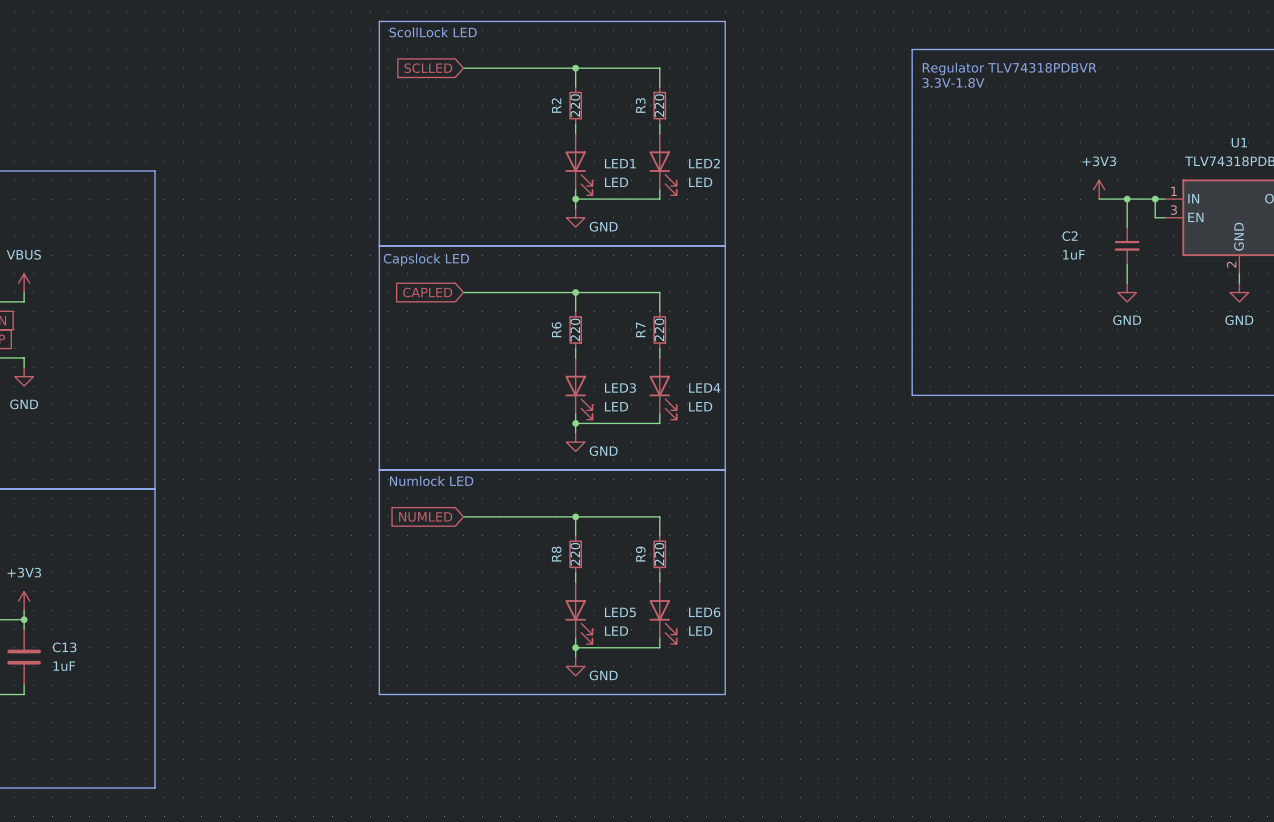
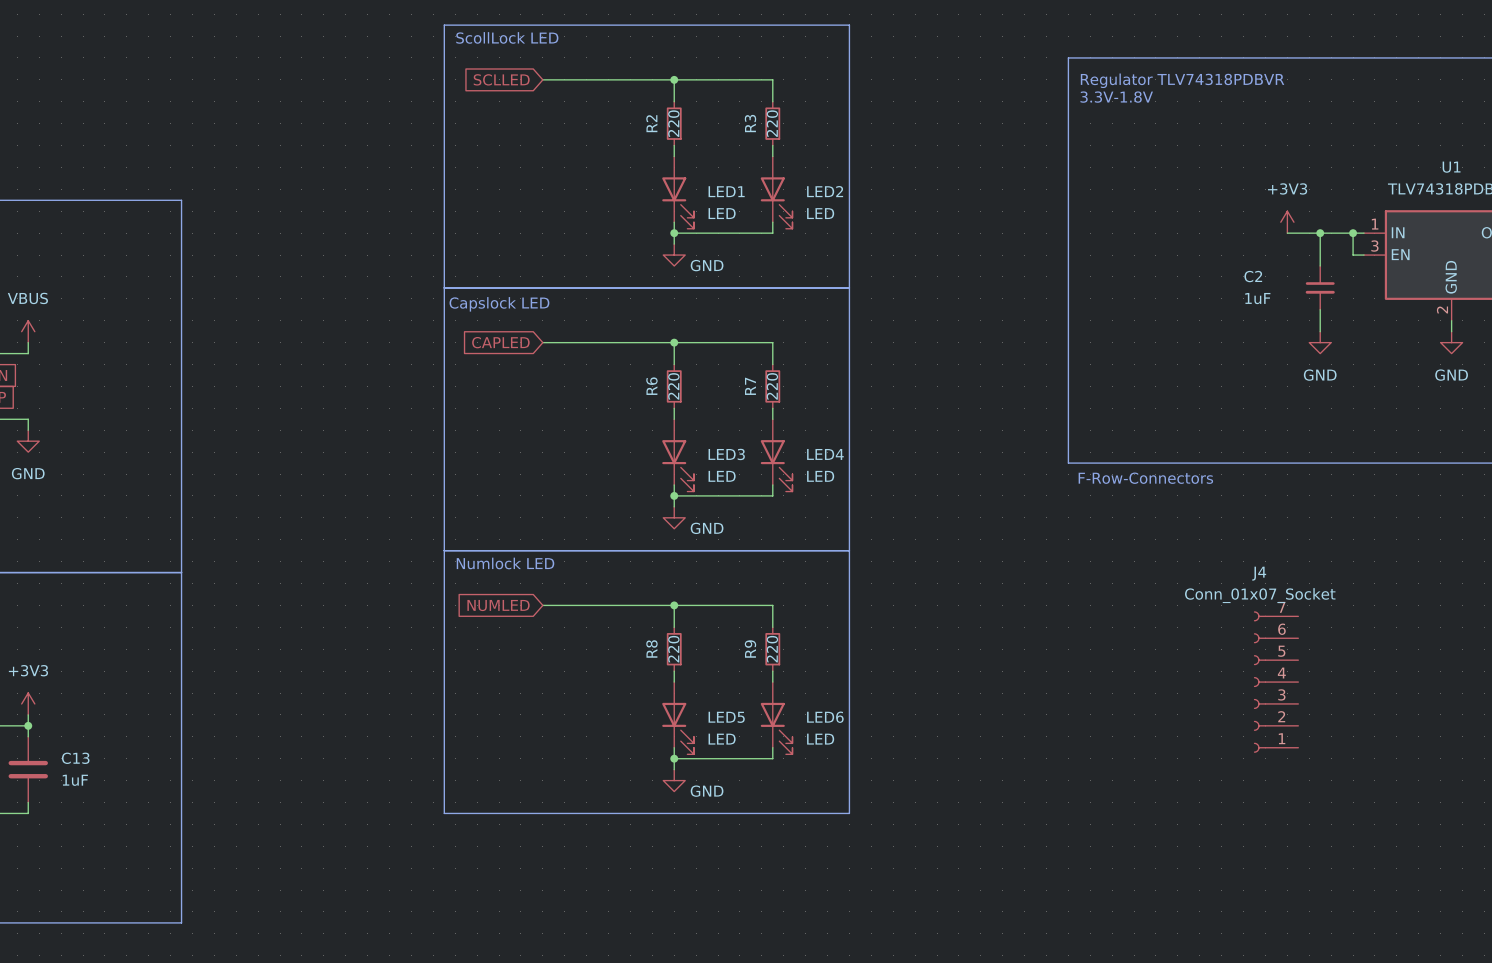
text: none -> F-Row-Connectors (1145, 478)
J4: none -> Conn_01x07_Socket (1276, 682)

